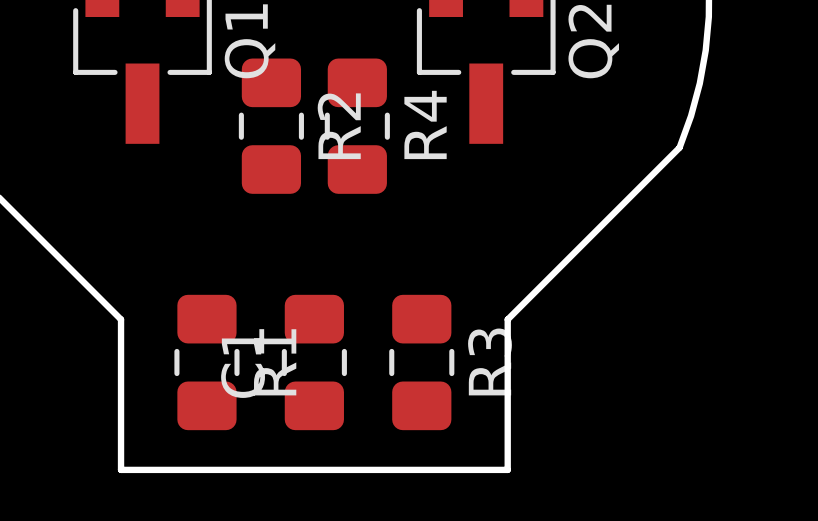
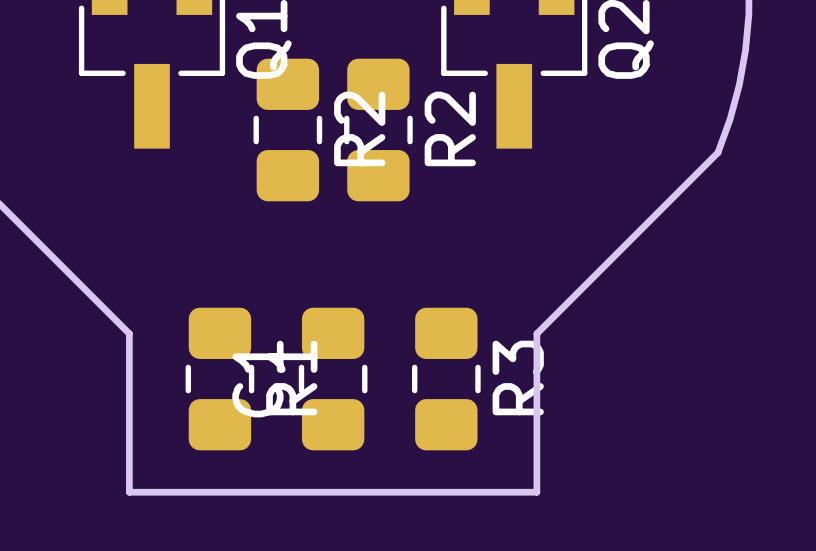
R4 name: R4 (425, 124) -> R2 (450, 128)

